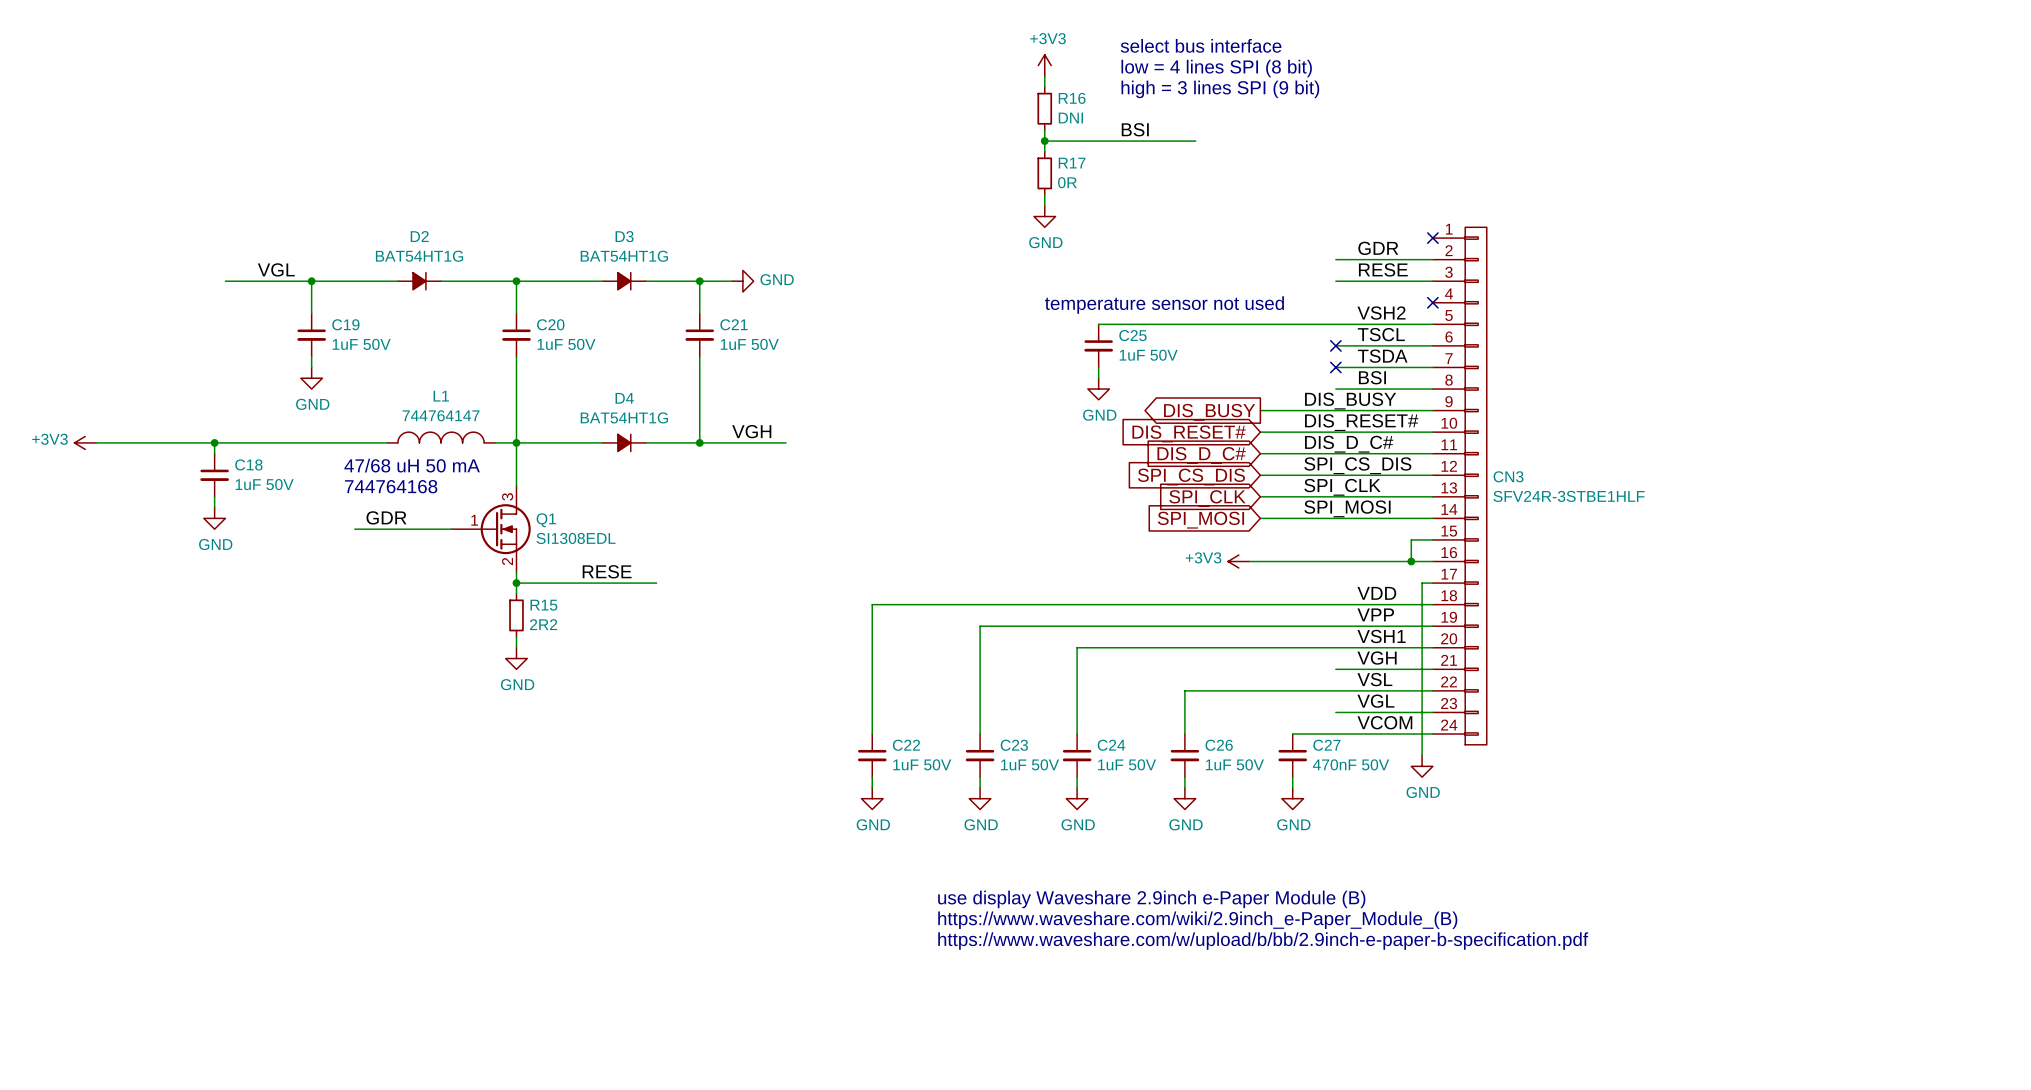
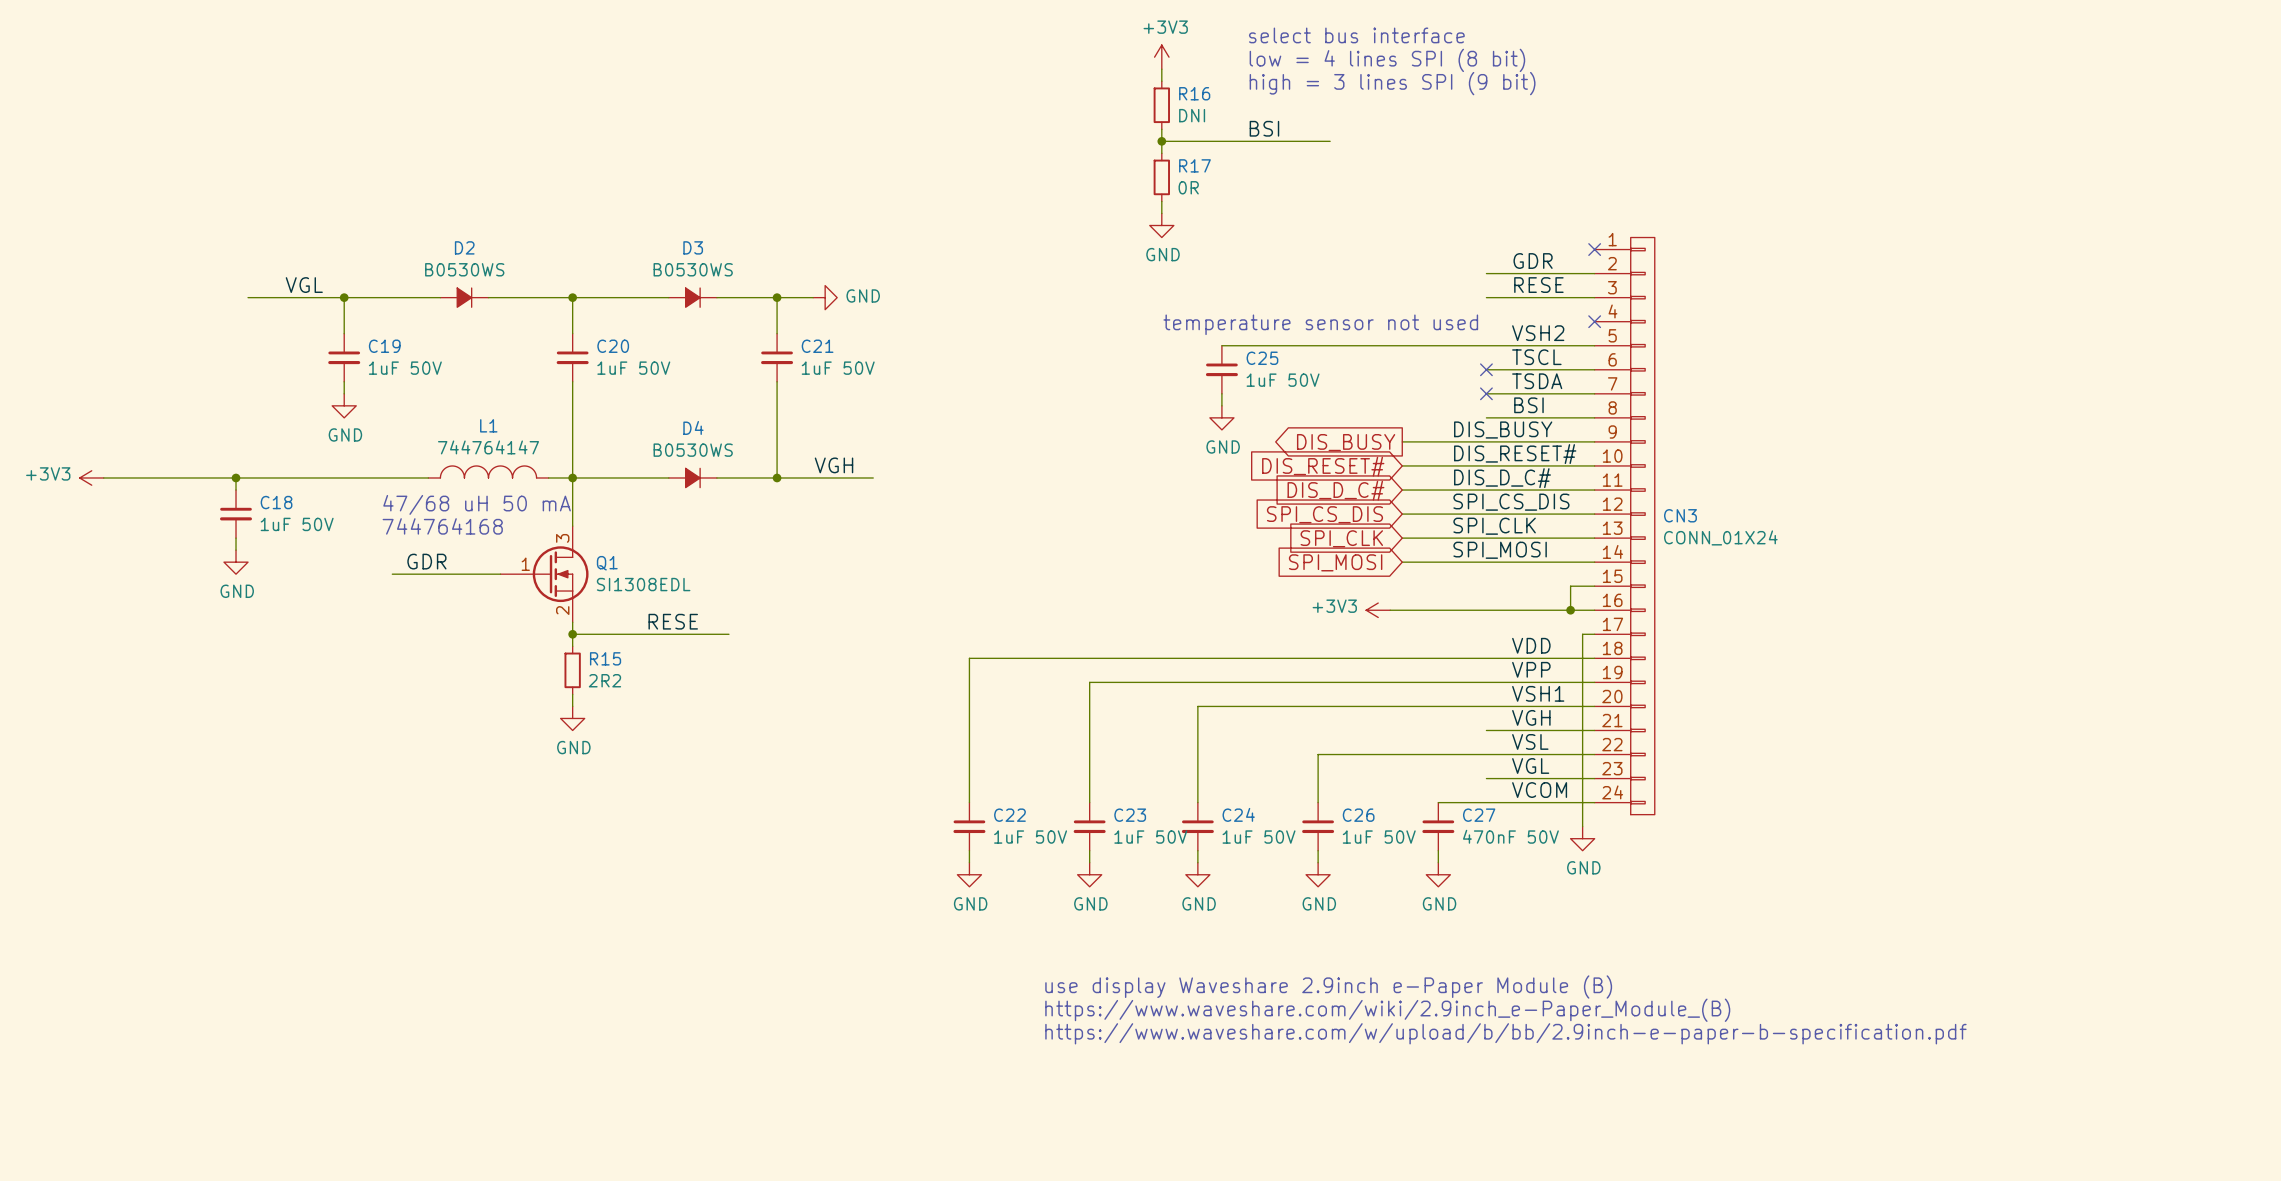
D2 value: BAT54HT1G (419, 256) -> B0530WS (464, 269)
D3 value: BAT54HT1G (624, 256) -> B0530WS (693, 269)
D4 value: BAT54HT1G (624, 417) -> B0530WS (693, 450)
CN3 value: SFV24R-3STBE1HLF (1569, 496) -> CONN_01X24 (1720, 537)

